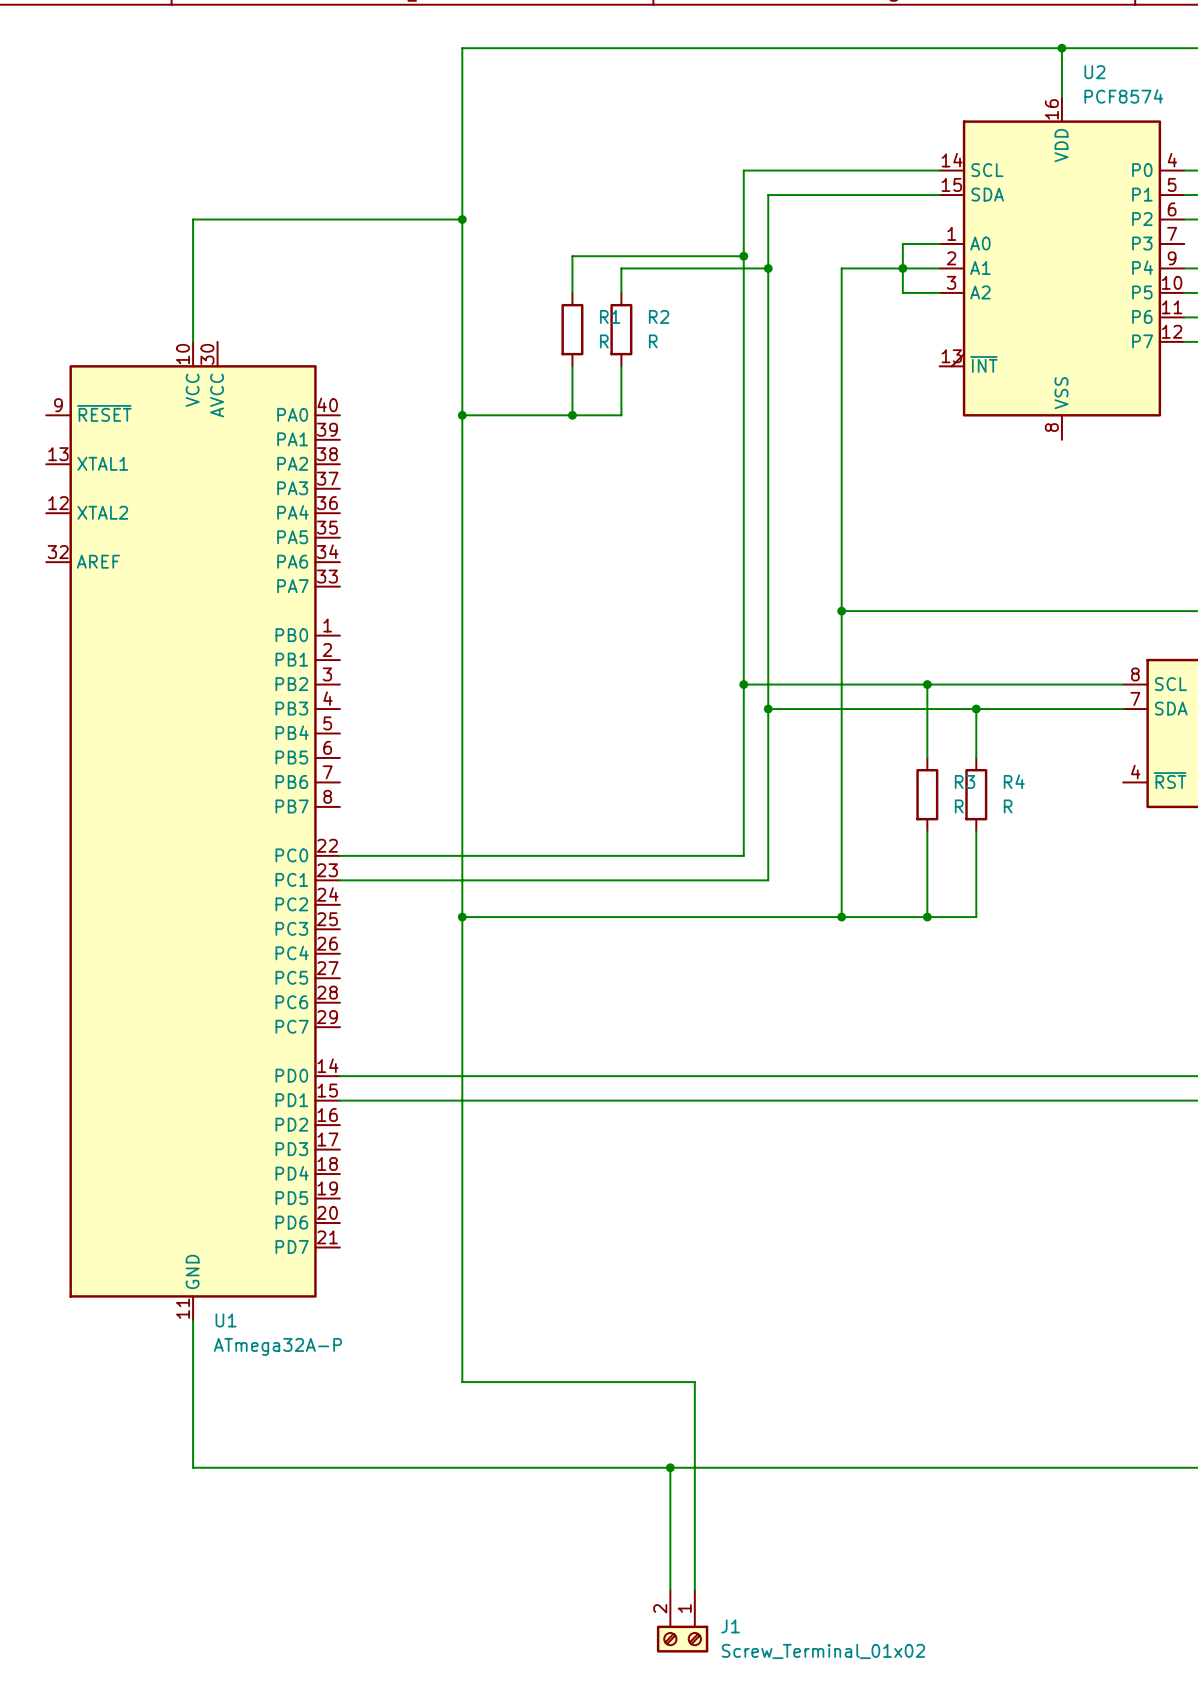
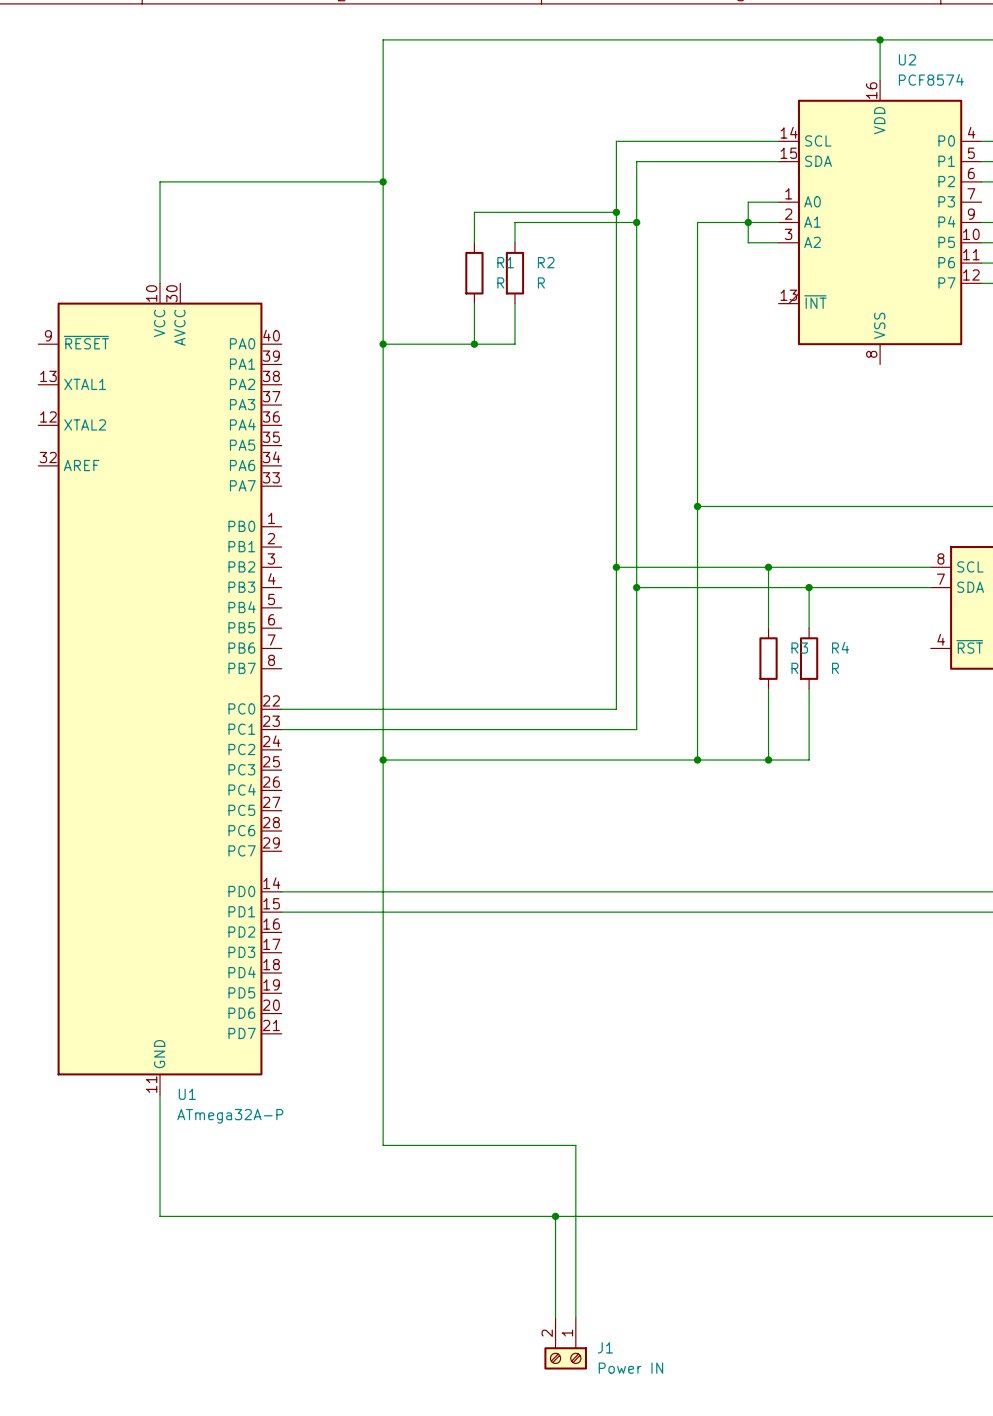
J1 value: Screw_Terminal_01x02 (823, 1651) -> Power IN (630, 1368)

